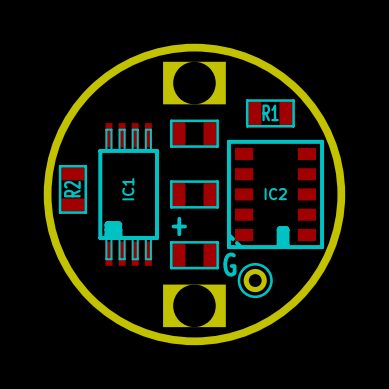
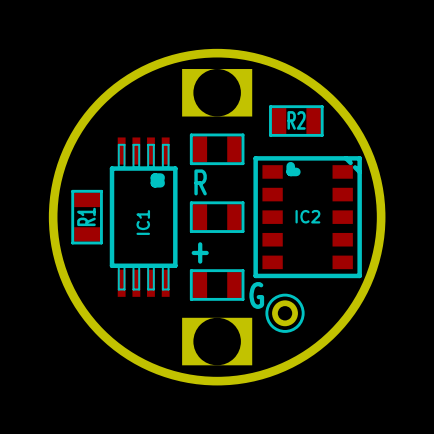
R1 rotation: 0° (270, 113) -> 90° clockwise (87, 217)
R1 position: (270, 113) -> (87, 217)
line: none -> (290, 166) (290, 171) (296, 171)
line: none -> (160, 177) (154, 177) (154, 183) (160, 183)
text: none -> R (200, 182)
R2 rotation: 0° (72, 189) -> 90° clockwise (296, 121)
R2 position: (72, 189) -> (296, 121)
IC1 rotation: 0° (128, 194) -> 180° (143, 217)
IC2 rotation: 0° (275, 194) -> 180° (307, 217)
line: (118, 224) (108, 224) (108, 234) (118, 234) (118, 229) (108, 229) -> none
line: (280, 229) (280, 245) (285, 245) (285, 229) (280, 229) -> none

